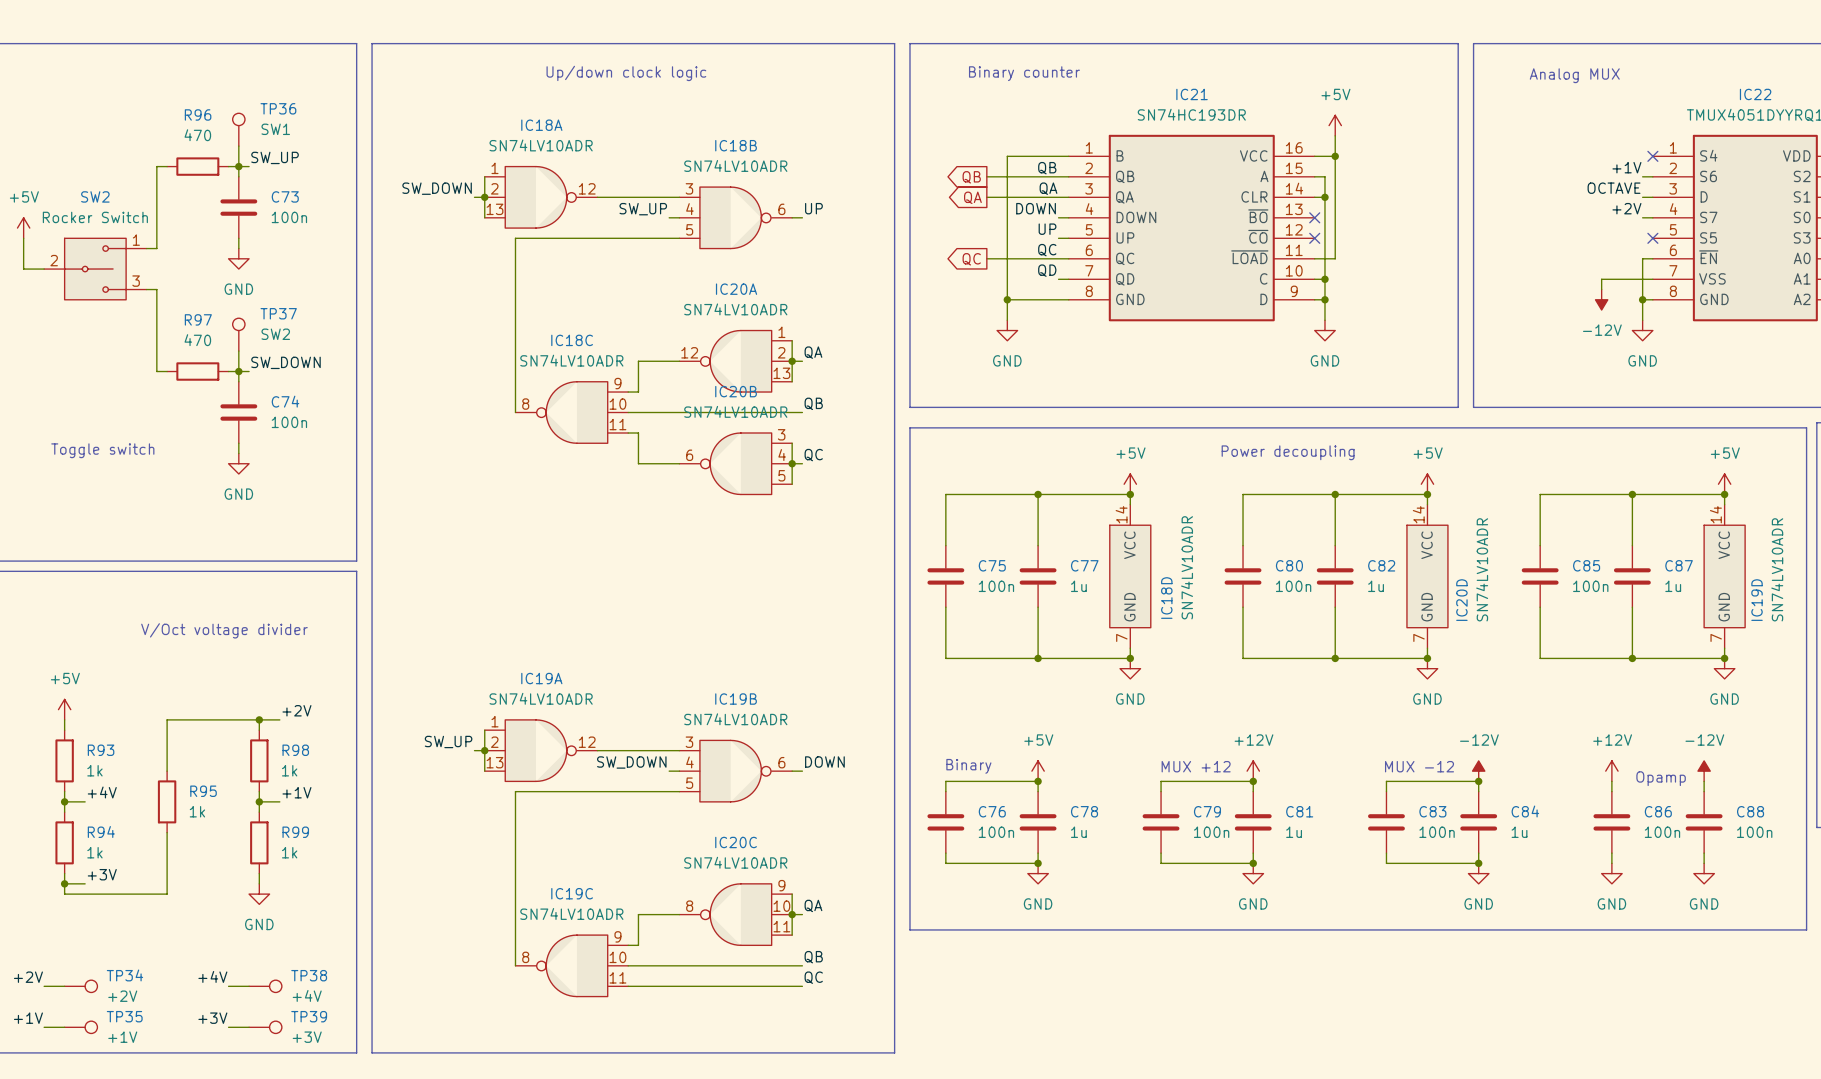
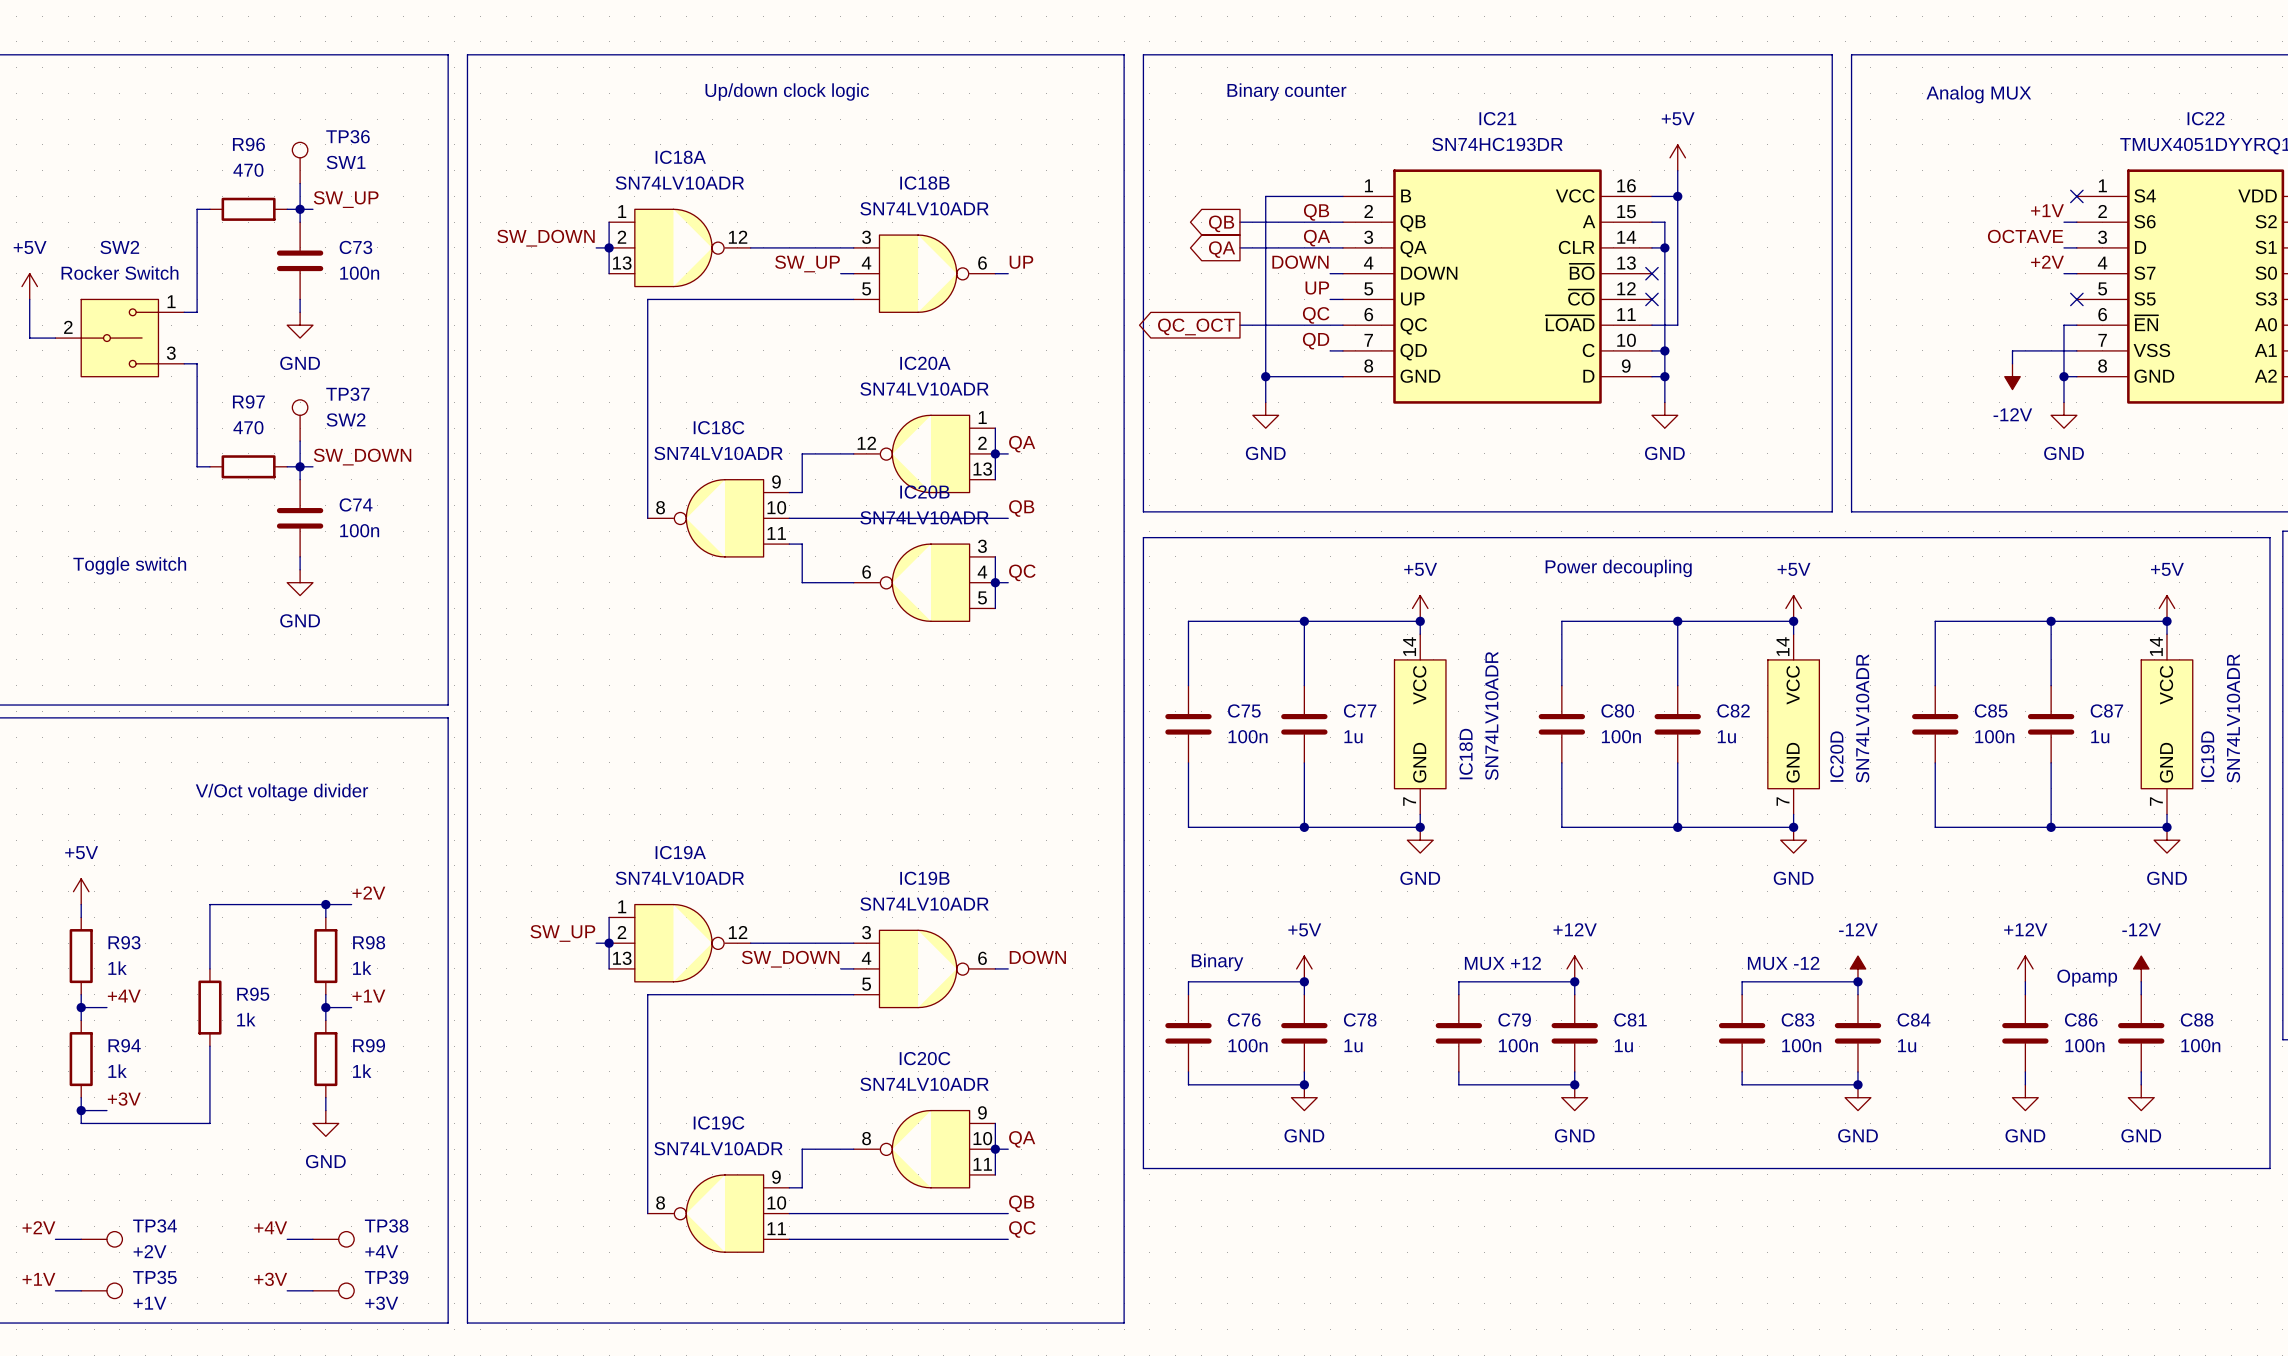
global label: QC (971, 259) -> QC_OCT (1196, 326)

